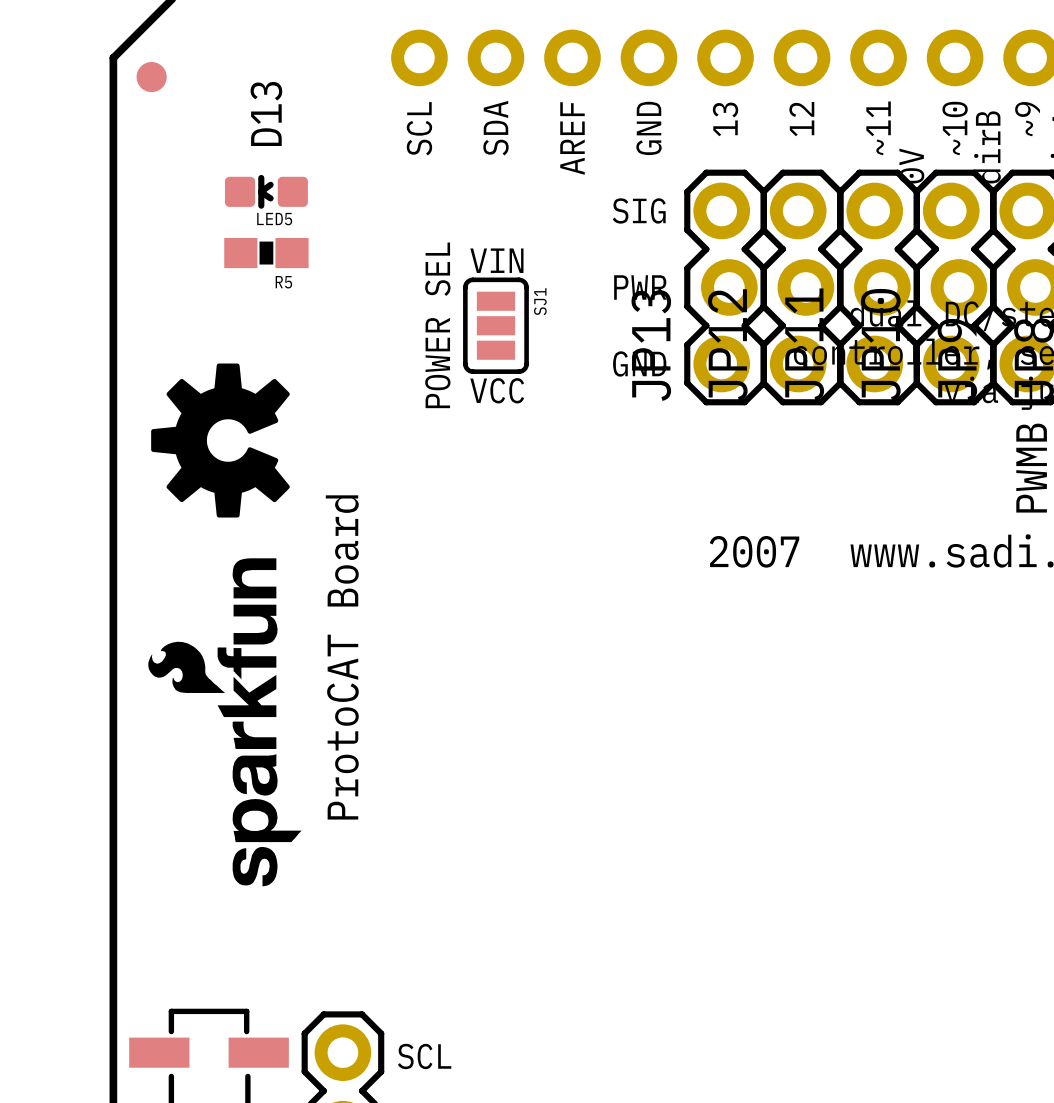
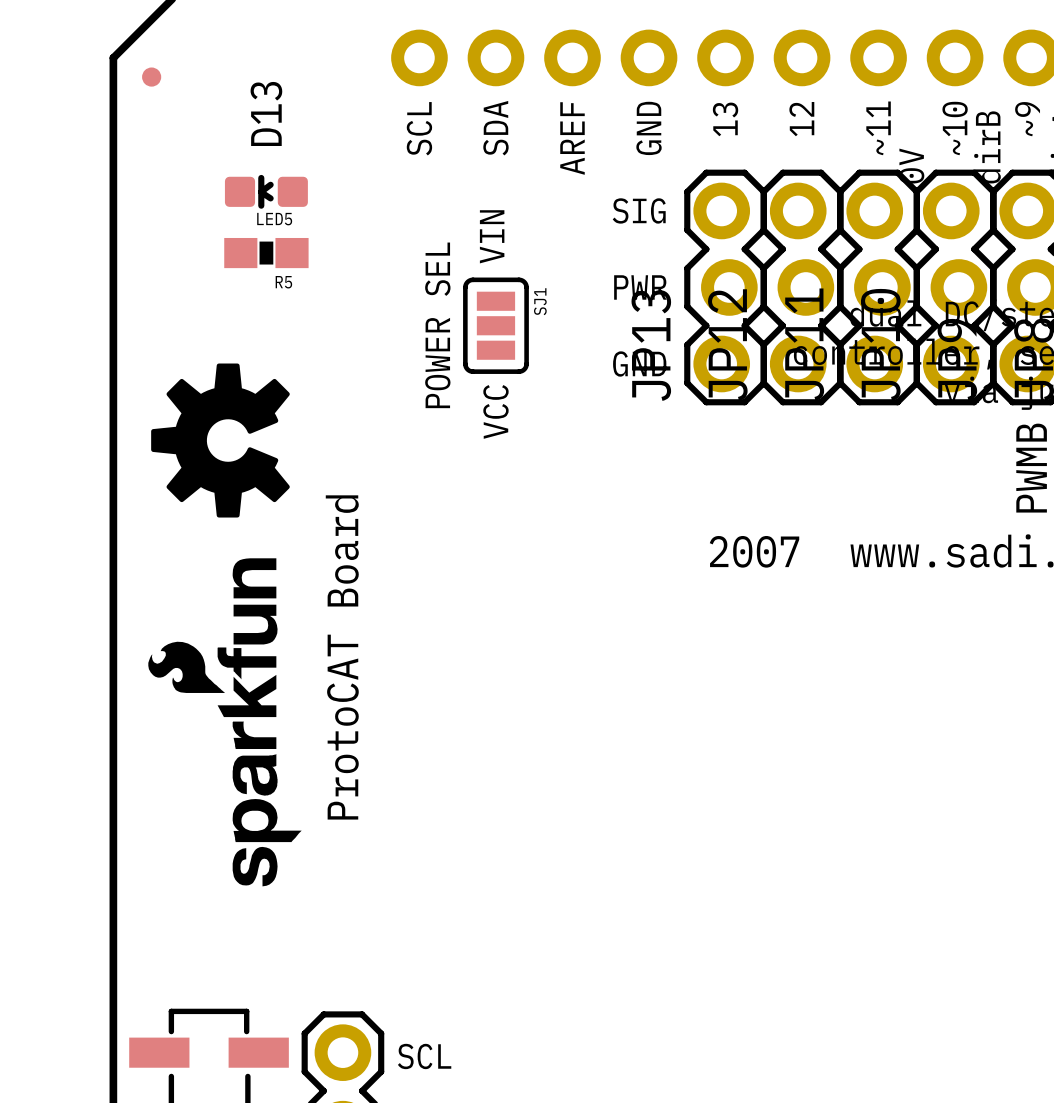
part footprint: [136, 61, 167, 93] -> [142, 67, 162, 87]
text rotation: 0° (496, 260) -> 90° counterclockwise (492, 236)
text rotation: 0° (497, 390) -> 90° counterclockwise (495, 411)

